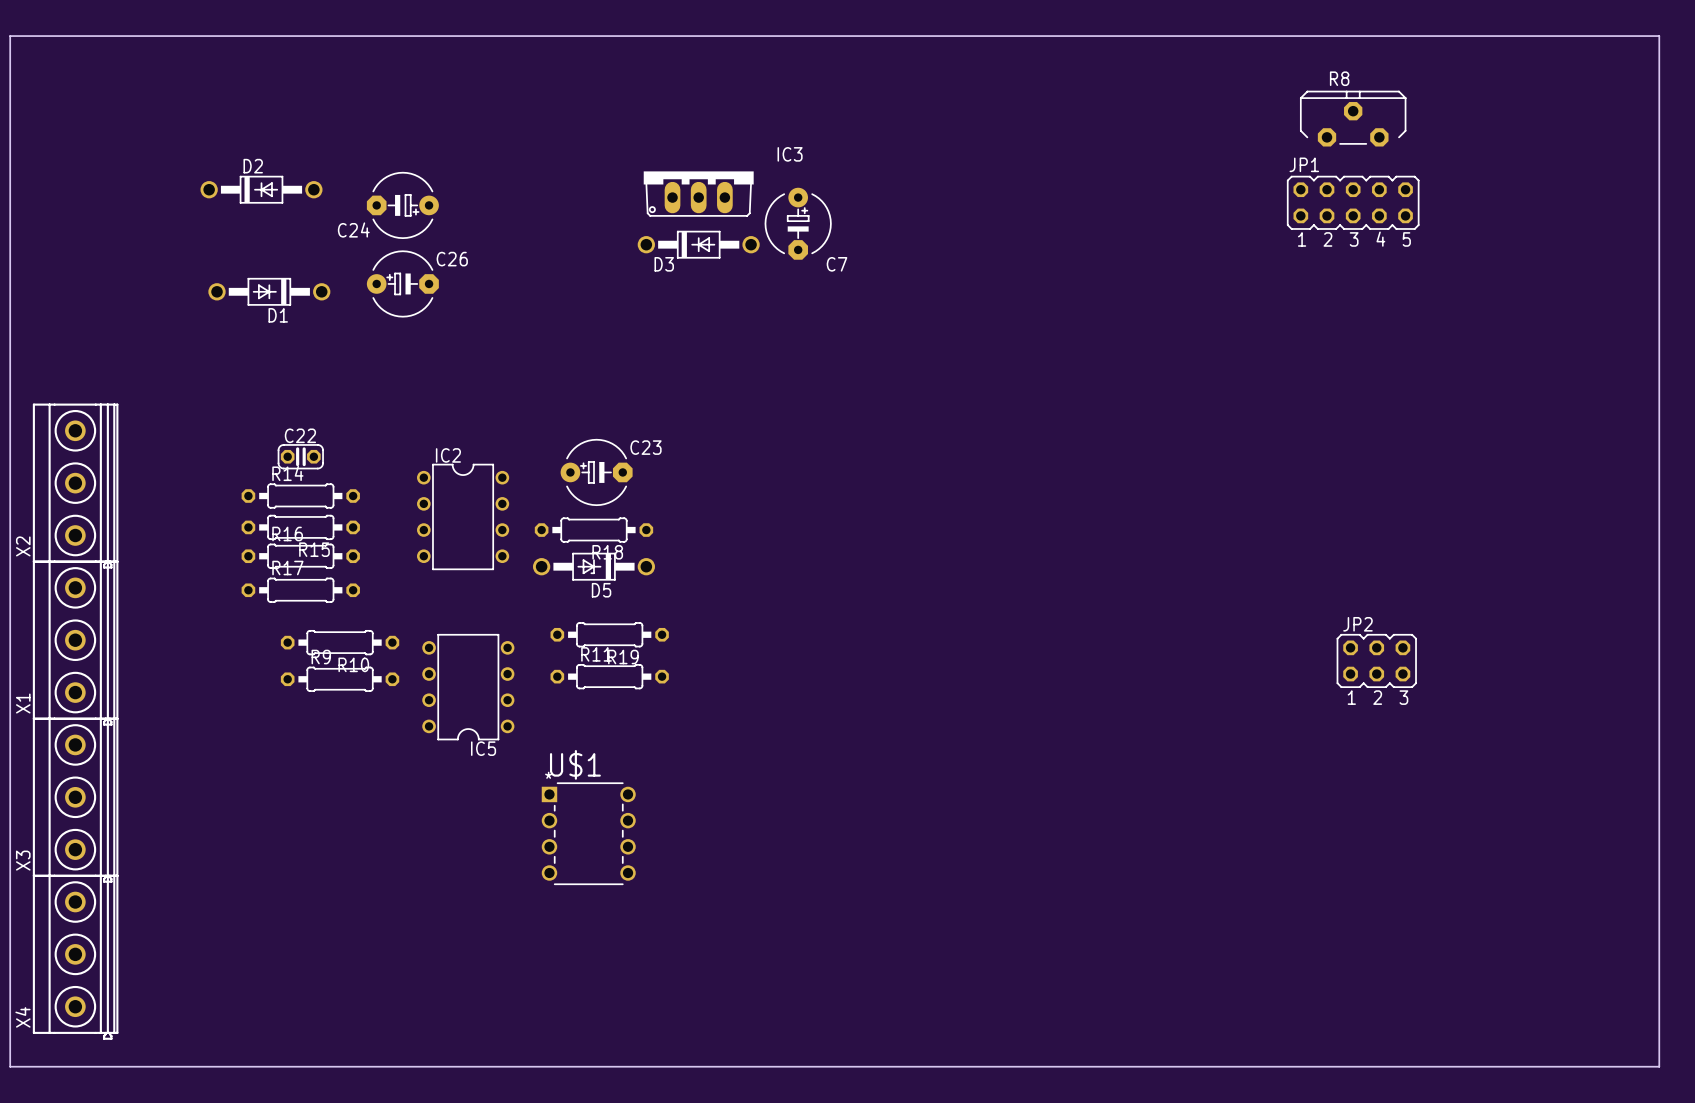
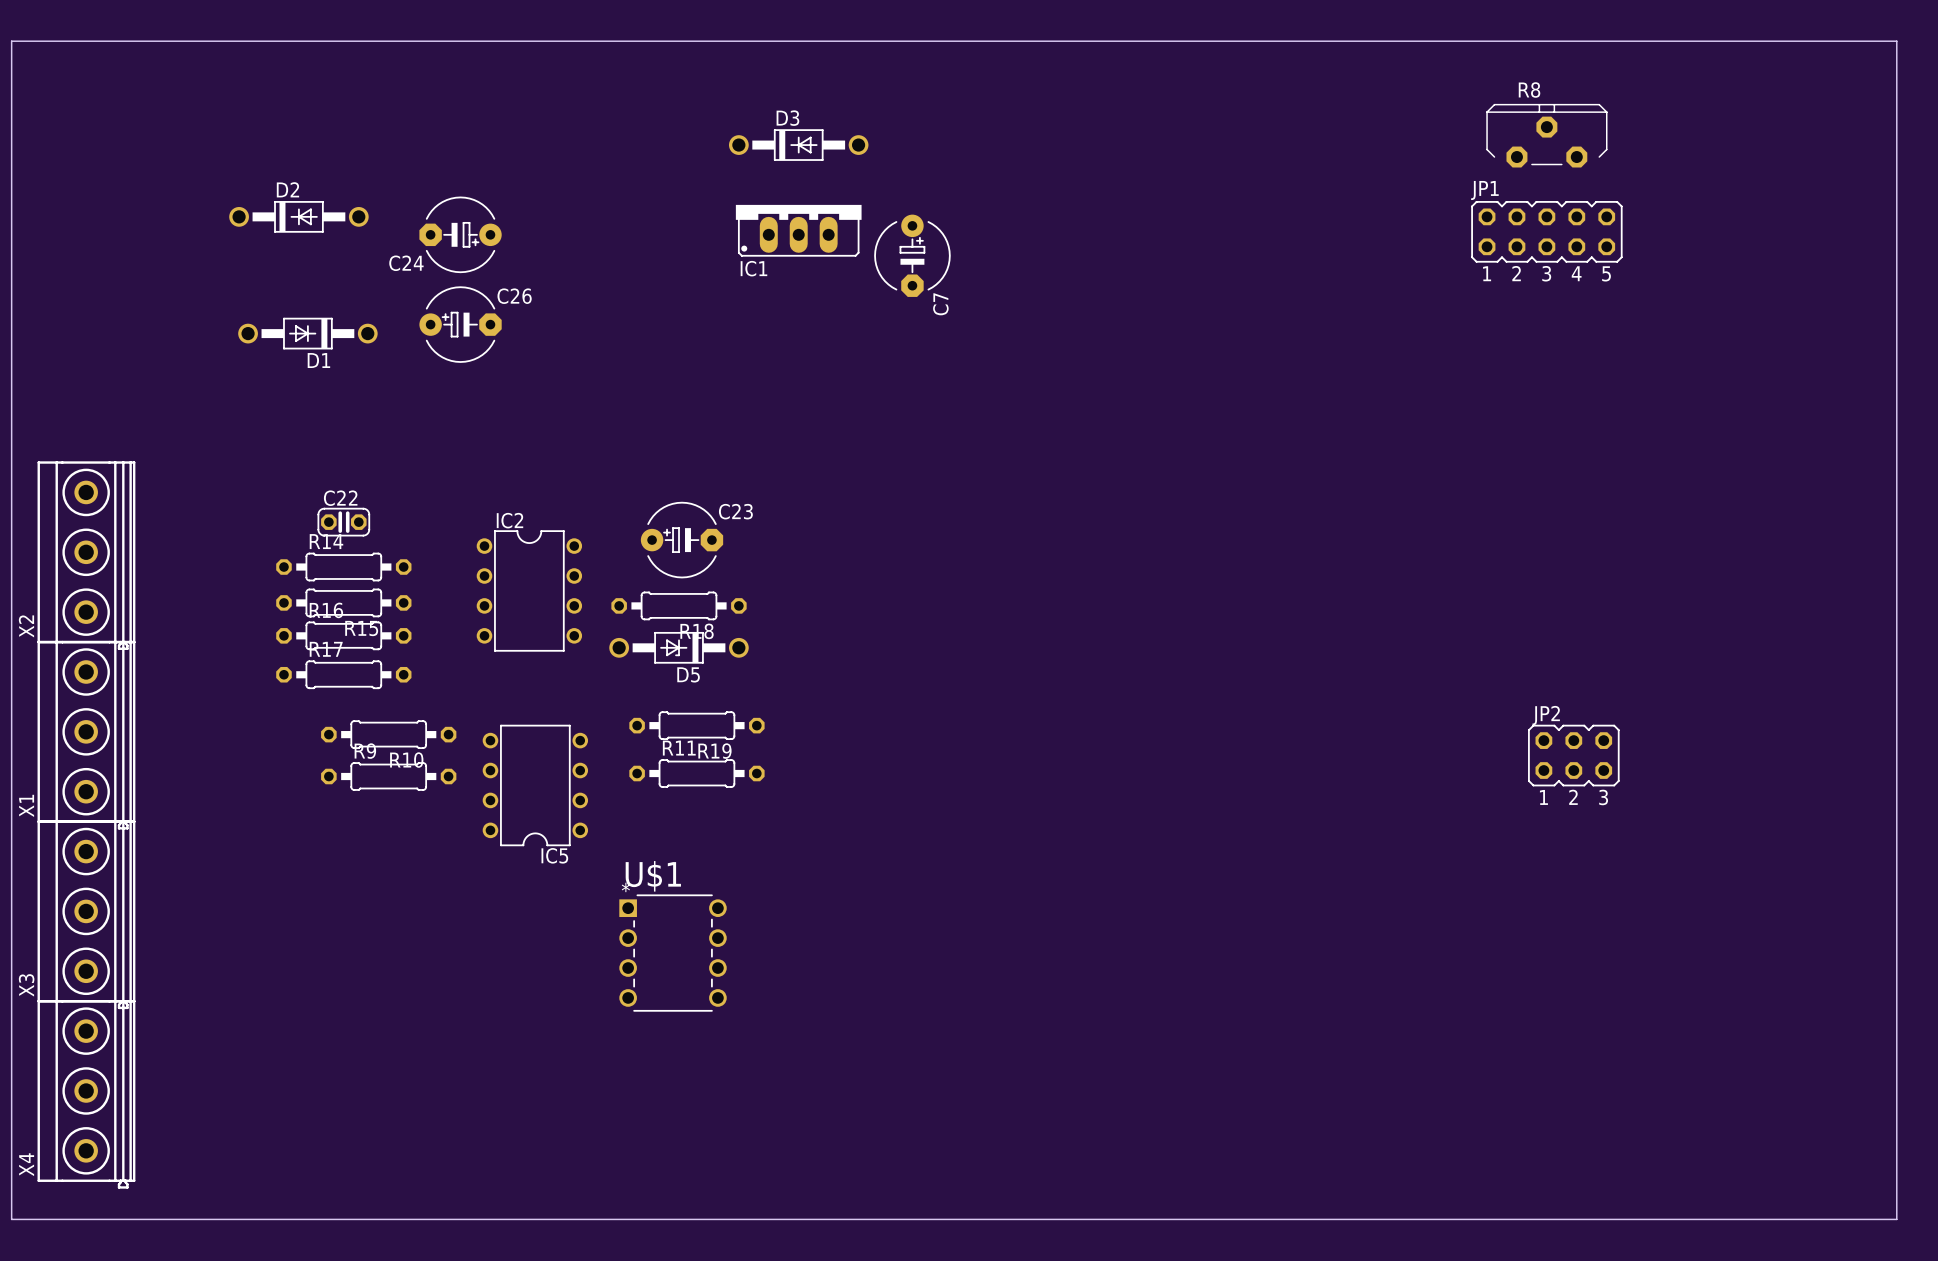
IC3: (698, 193) -> none
IC1: none -> (798, 230)
D3 position: (698, 244) -> (798, 145)
D3 name position: D3 (664, 264) -> D3 (787, 118)
C7 name rotation: 0° (837, 264) -> 90° counterclockwise (940, 304)

